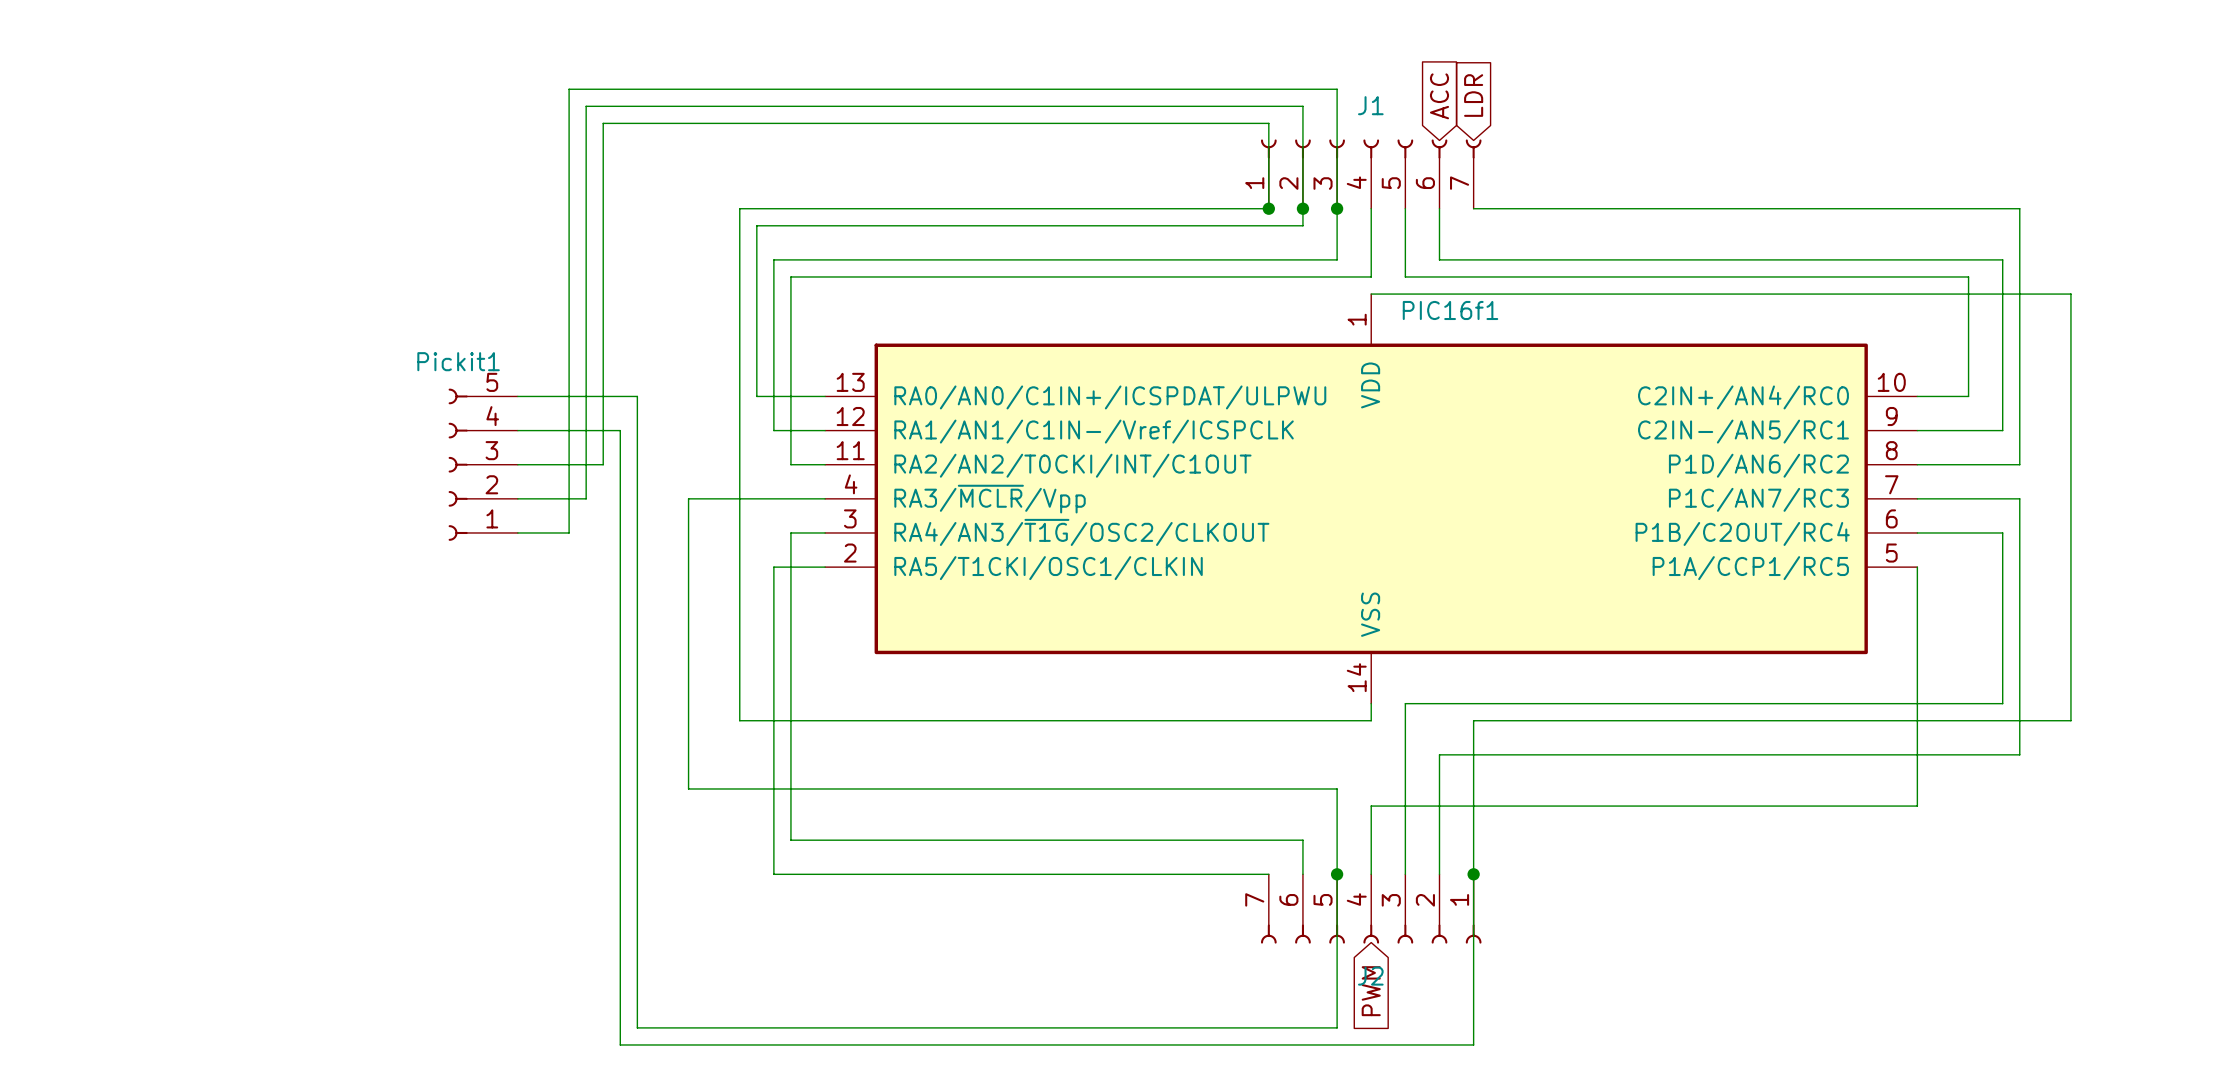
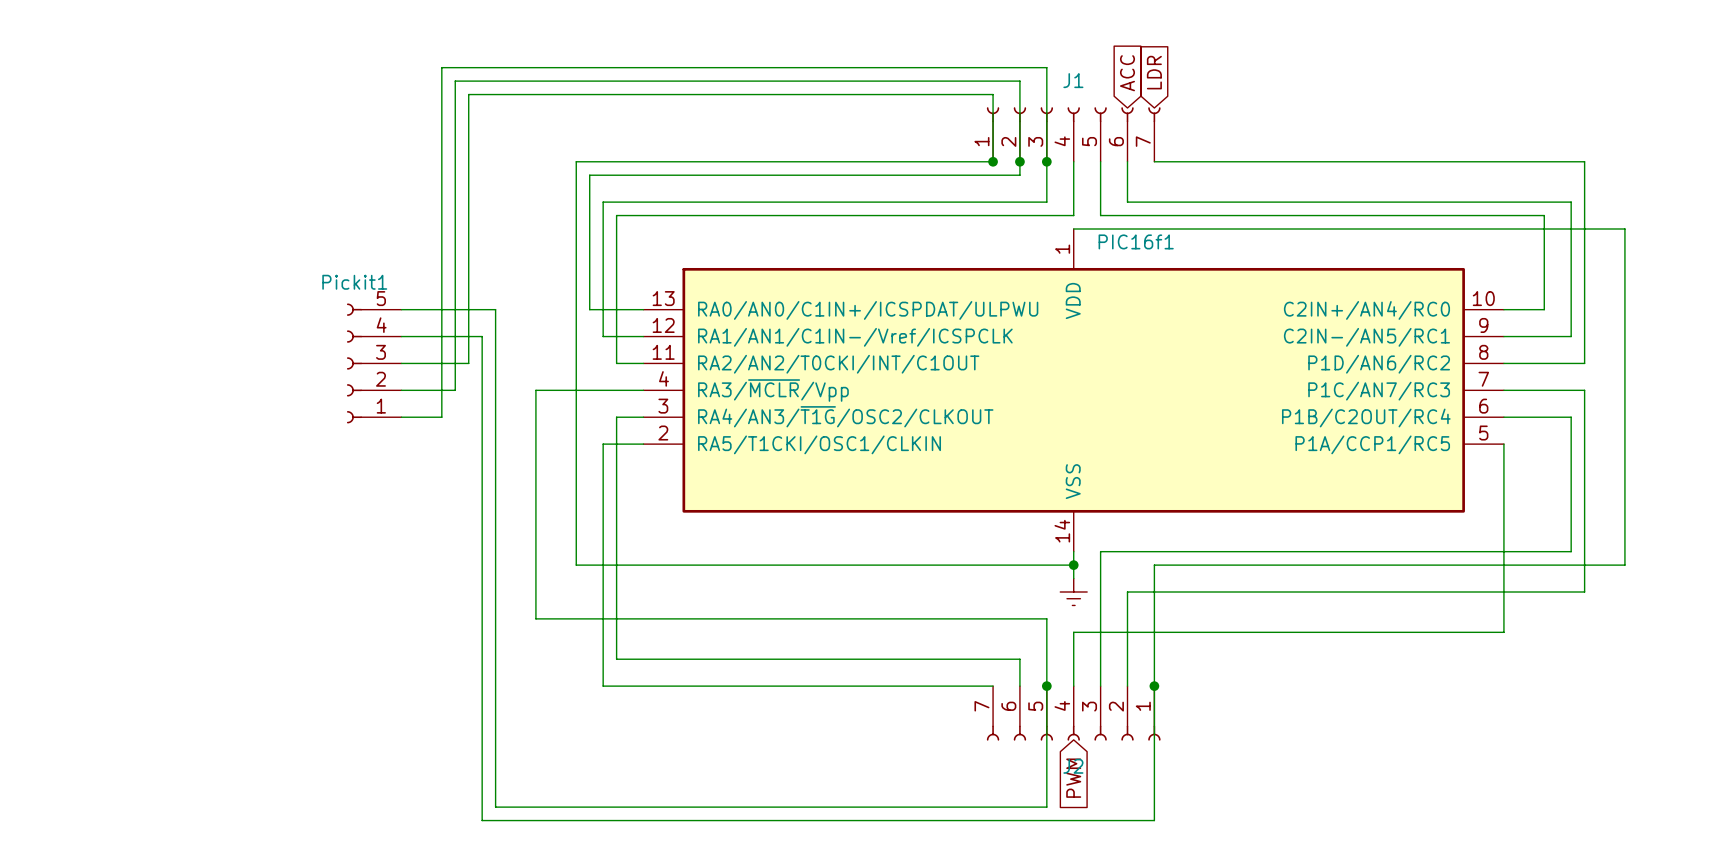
wire: none -> (1073, 565) (1073, 578)
junction: none -> (1073, 565)
power symbol: none -> (1073, 592)

